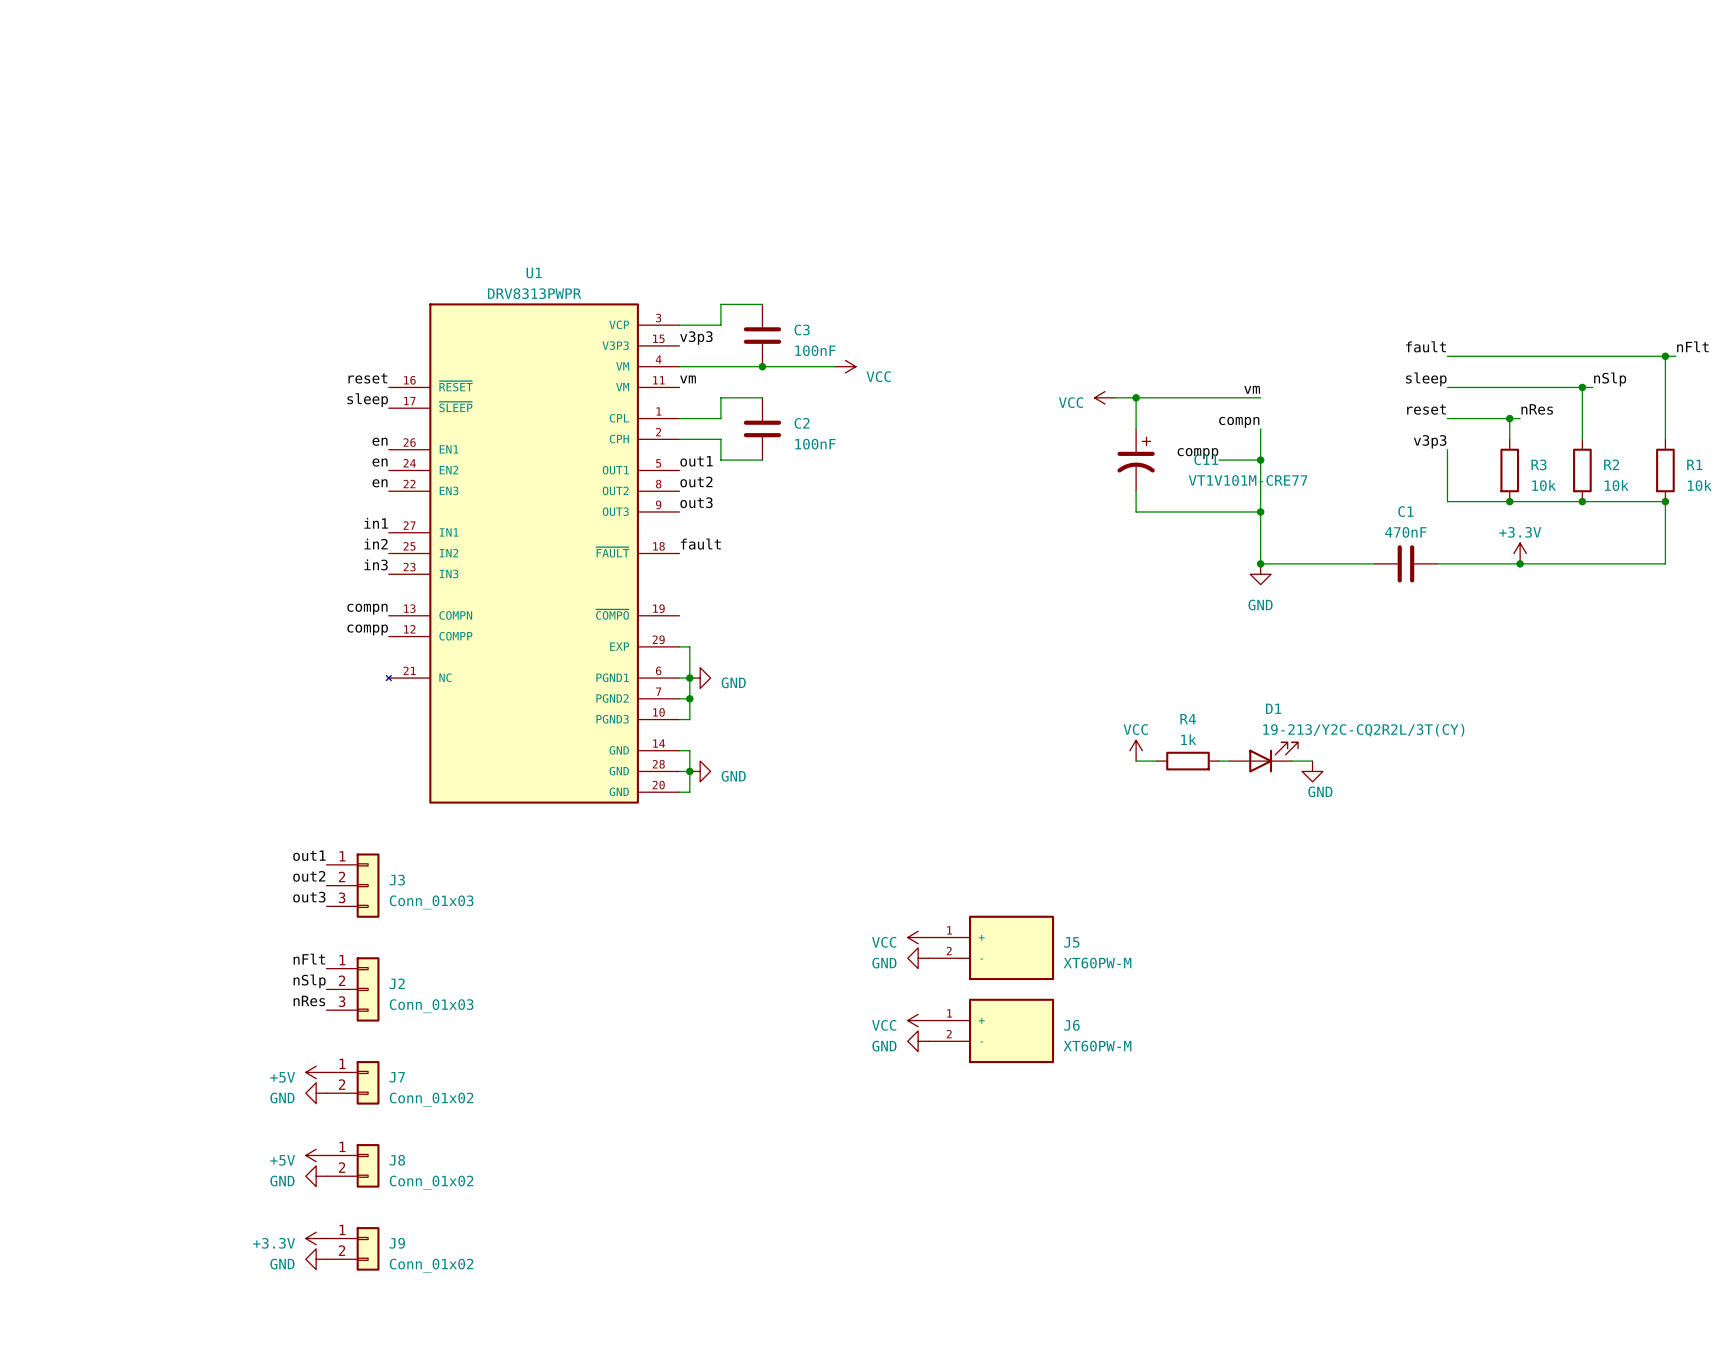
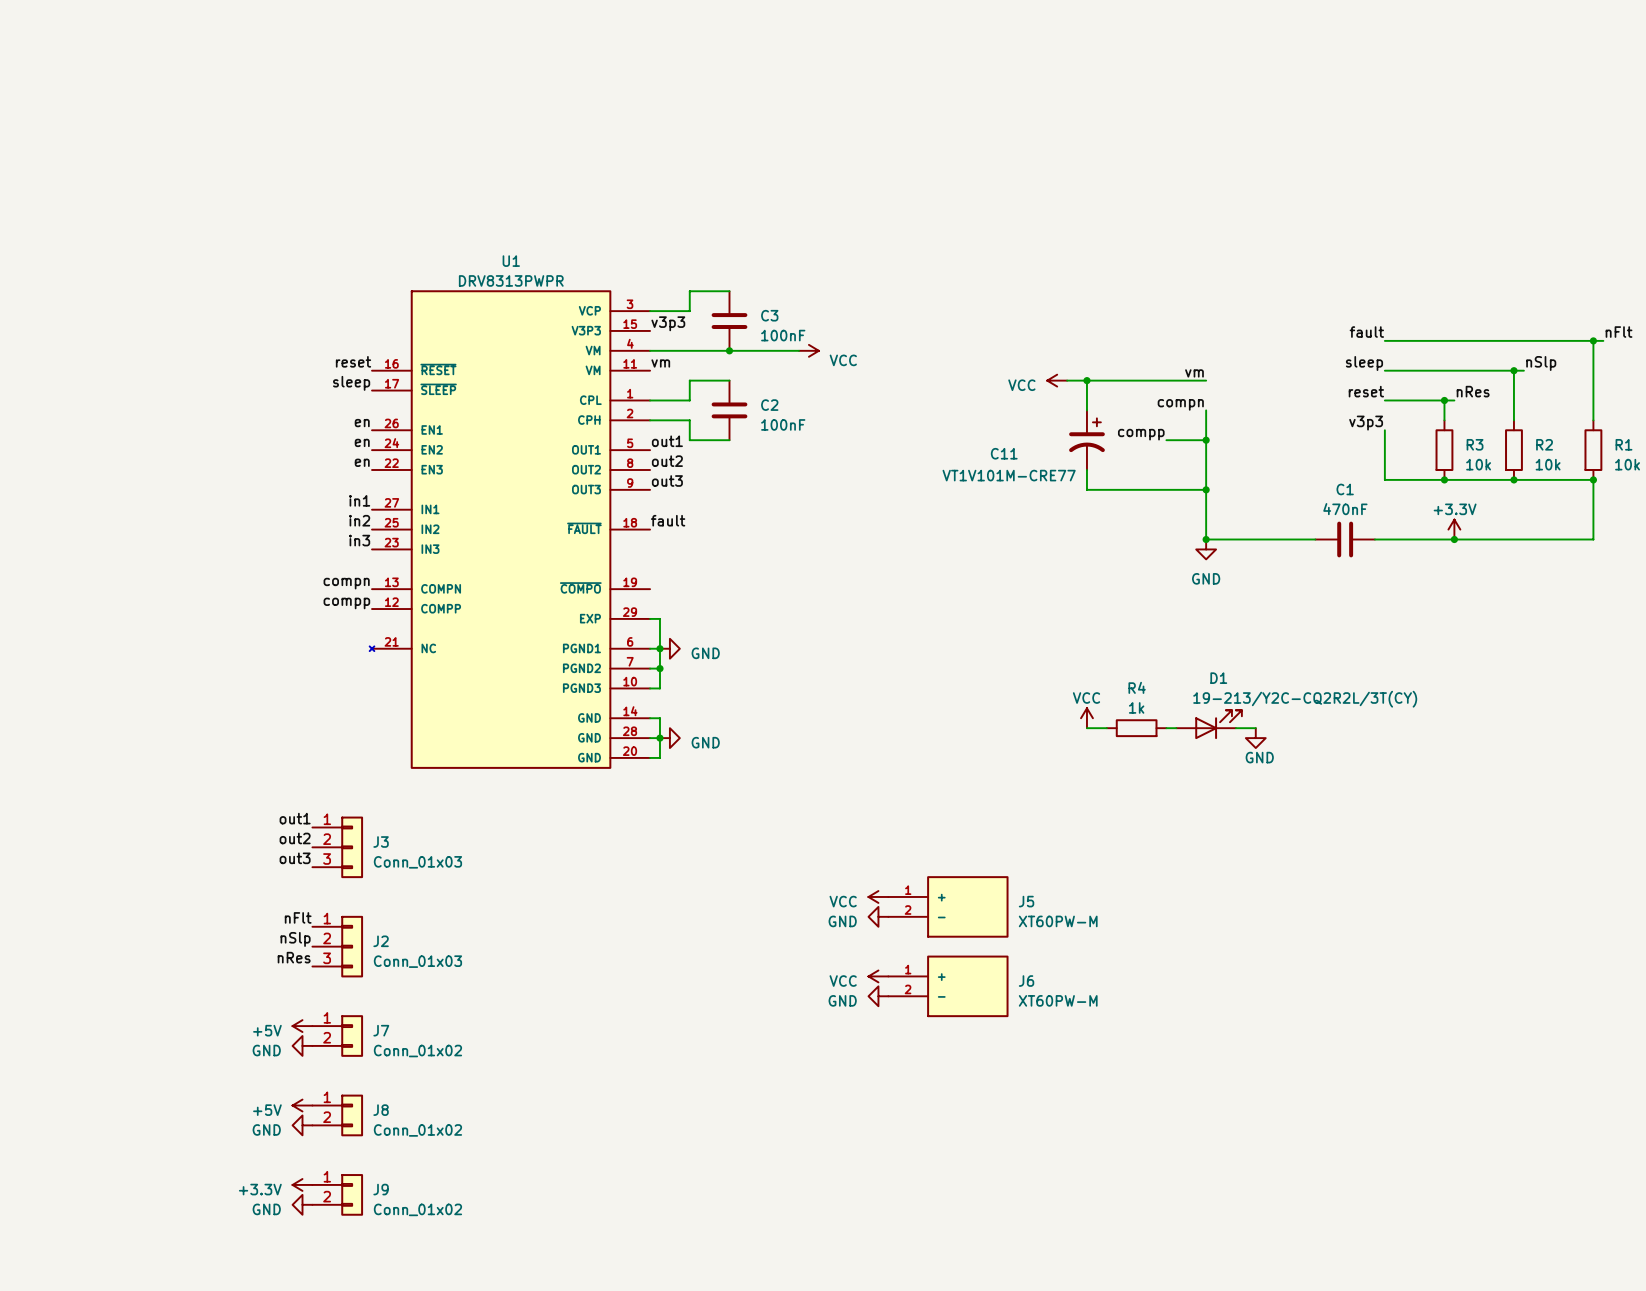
C11 name position: C11 (1206, 459) -> C11 (1004, 453)
C11 value position: VT1V101M-CRE77 (1248, 480) -> VT1V101M-CRE77 (1009, 475)

